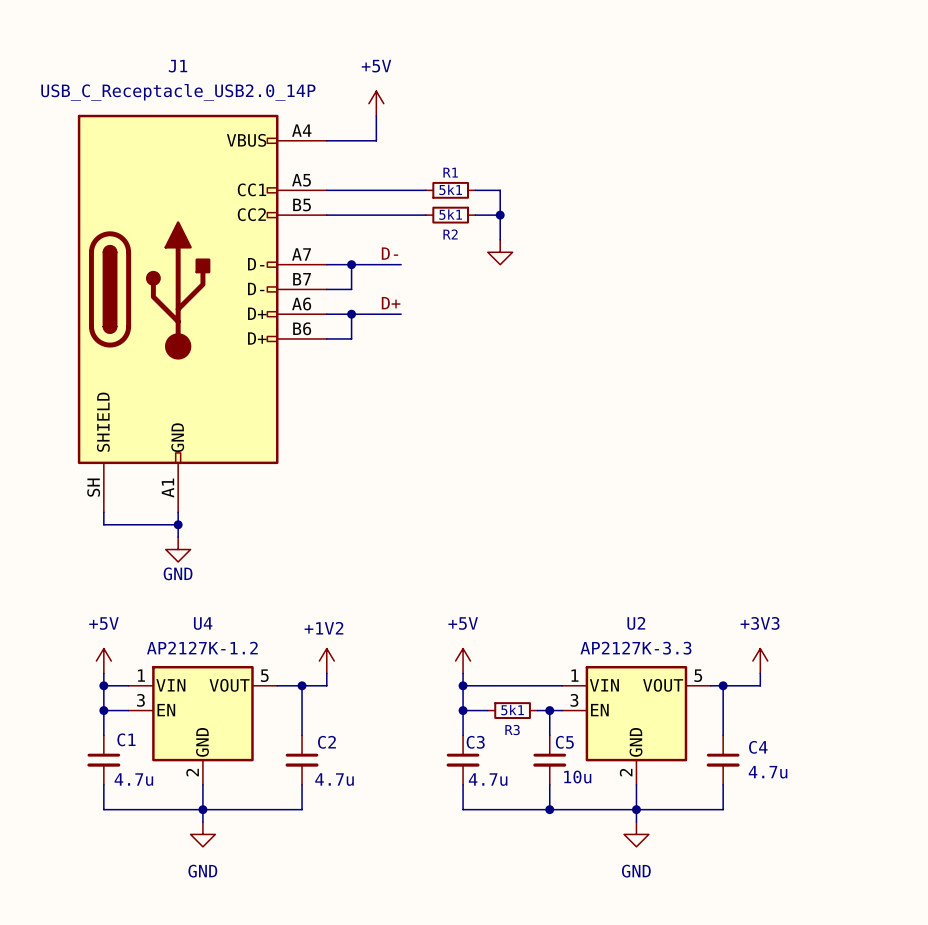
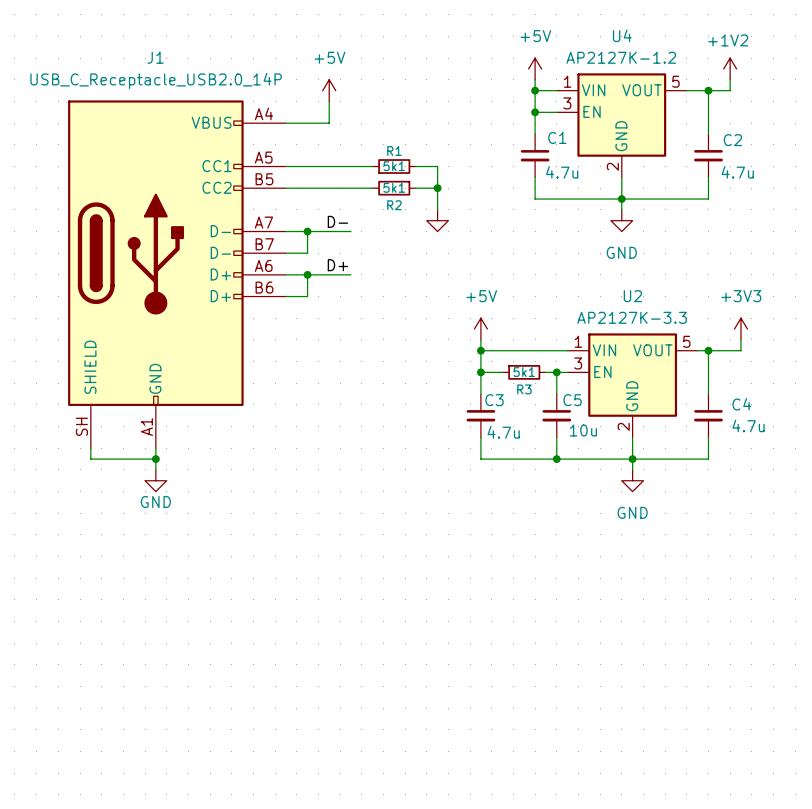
power symbol: none -> +5V (535, 69)
power symbol: none -> +1V2 (730, 69)
wire: none -> (535, 79) (535, 134)
wire: none -> (730, 79) (730, 90) (686, 90)
wire: none -> (535, 90) (556, 90)
junction: none -> (535, 90)
wire: none -> (708, 90) (708, 134)
junction: none -> (708, 90)
wire: none -> (535, 112) (556, 112)
junction: none -> (535, 112)
wire: none -> (535, 177) (535, 199) (708, 199) (708, 177)
wire: none -> (621, 177) (621, 209)
junction: none -> (621, 199)
power symbol: none -> GND (621, 220)
power symbol: none -> +5V (480, 329)
power symbol: none -> +3V3 (740, 329)
wire: none -> (480, 339) (480, 394)
wire: none -> (740, 339) (740, 350) (697, 350)
wire: none -> (480, 350) (567, 350)
junction: none -> (480, 350)
wire: none -> (708, 350) (708, 394)
junction: none -> (708, 350)
wire: none -> (480, 372) (502, 372)
junction: none -> (480, 372)
wire: none -> (545, 372) (567, 372)
wire: none -> (556, 372) (556, 394)
junction: none -> (556, 372)
wire: none -> (480, 437) (480, 459) (708, 459) (708, 437)
wire: none -> (632, 437) (632, 469)
junction: none -> (556, 459)
junction: none -> (632, 459)
power symbol: none -> GND (632, 480)
power symbol: +5V (103, 661) -> none
power symbol: +1V2 (326, 661) -> none
power symbol: +5V (463, 661) -> none
power symbol: +3V3 (760, 661) -> none
wire: (103, 673) (103, 735) -> none
wire: (326, 673) (326, 685) (277, 685) -> none
wire: (463, 673) (463, 735) -> none
wire: (760, 673) (760, 685) (710, 685) -> none
wire: (103, 685) (128, 685) -> none
junction: (103, 685) -> none
wire: (302, 685) (302, 735) -> none
junction: (302, 685) -> none
wire: (463, 685) (562, 685) -> none
junction: (463, 685) -> none
wire: (723, 685) (723, 735) -> none
junction: (723, 685) -> none
wire: (103, 710) (128, 710) -> none
junction: (103, 710) -> none
wire: (463, 710) (487, 710) -> none
junction: (463, 710) -> none
R3 position: (512, 710) -> (524, 372)
wire: (537, 710) (562, 710) -> none
wire: (549, 710) (549, 735) -> (556, 437) (556, 459)
junction: (549, 710) -> none
U4 position: (202, 725) -> (621, 125)
U2 position: (636, 725) -> (632, 385)
C1 position: (103, 760) -> (535, 155)
C2 position: (302, 760) -> (708, 155)
C3 position: (463, 760) -> (480, 415)
C5 position: (549, 760) -> (556, 415)
C4 position: (723, 760) -> (708, 415)
wire: (103, 784) (103, 809) (302, 809) (302, 784) -> none
wire: (202, 784) (202, 822) -> none
wire: (463, 784) (463, 809) (723, 809) (723, 784) -> none
wire: (549, 784) (549, 809) -> none
wire: (636, 784) (636, 822) -> none
junction: (202, 809) -> none
junction: (549, 809) -> none
junction: (636, 809) -> none
power symbol: GND (202, 834) -> none
power symbol: GND (636, 834) -> none

